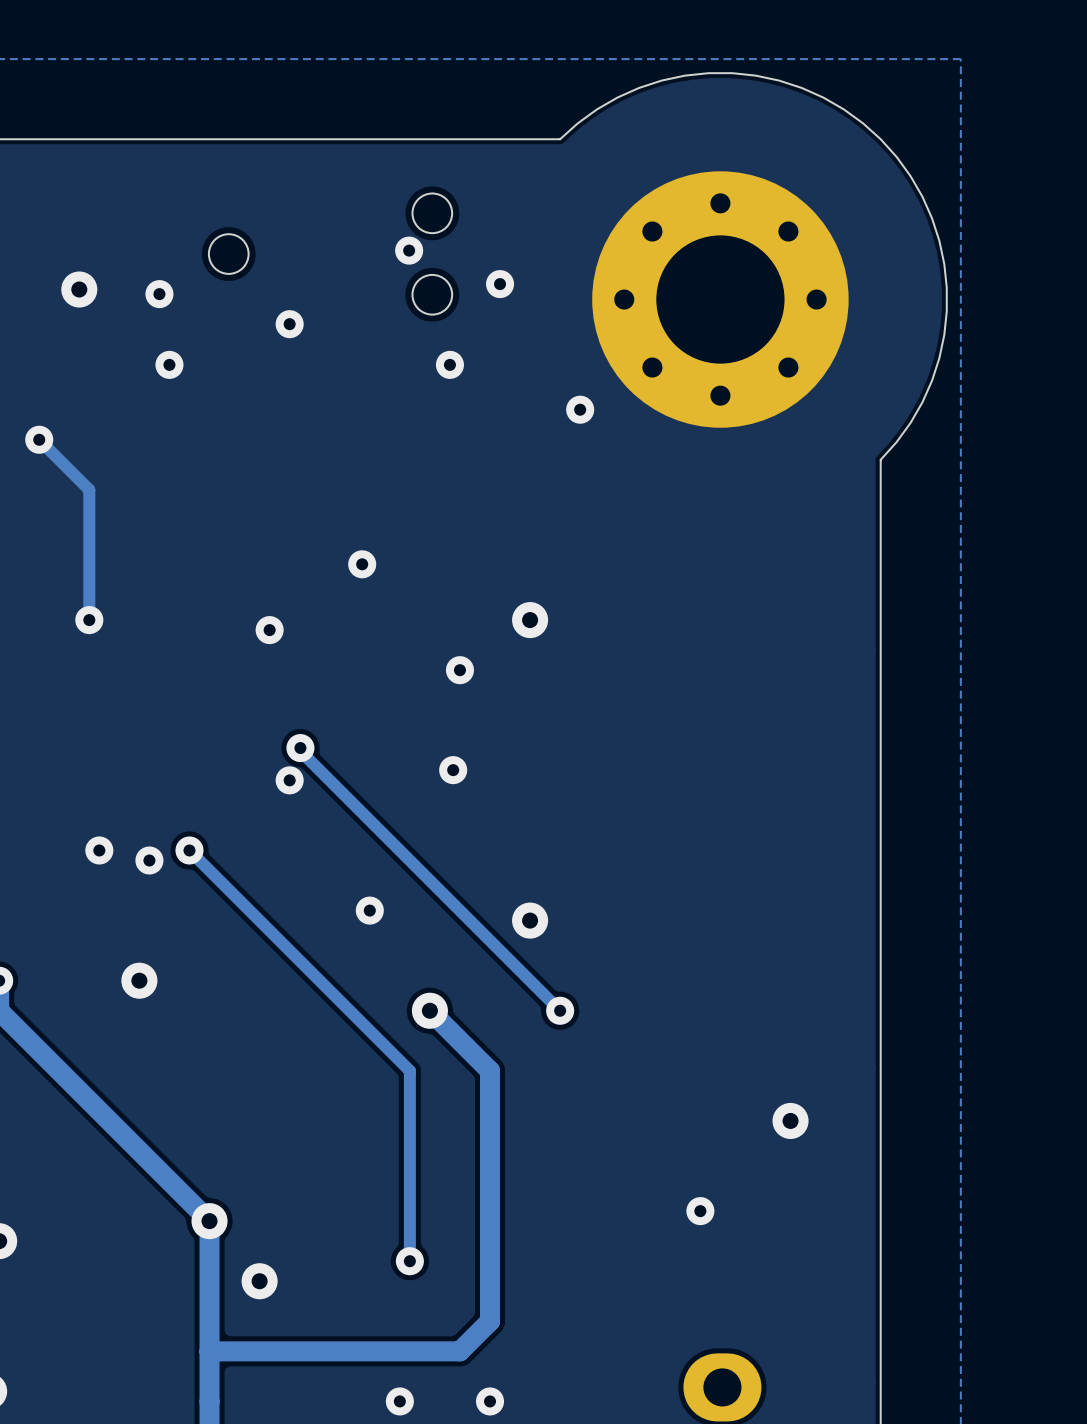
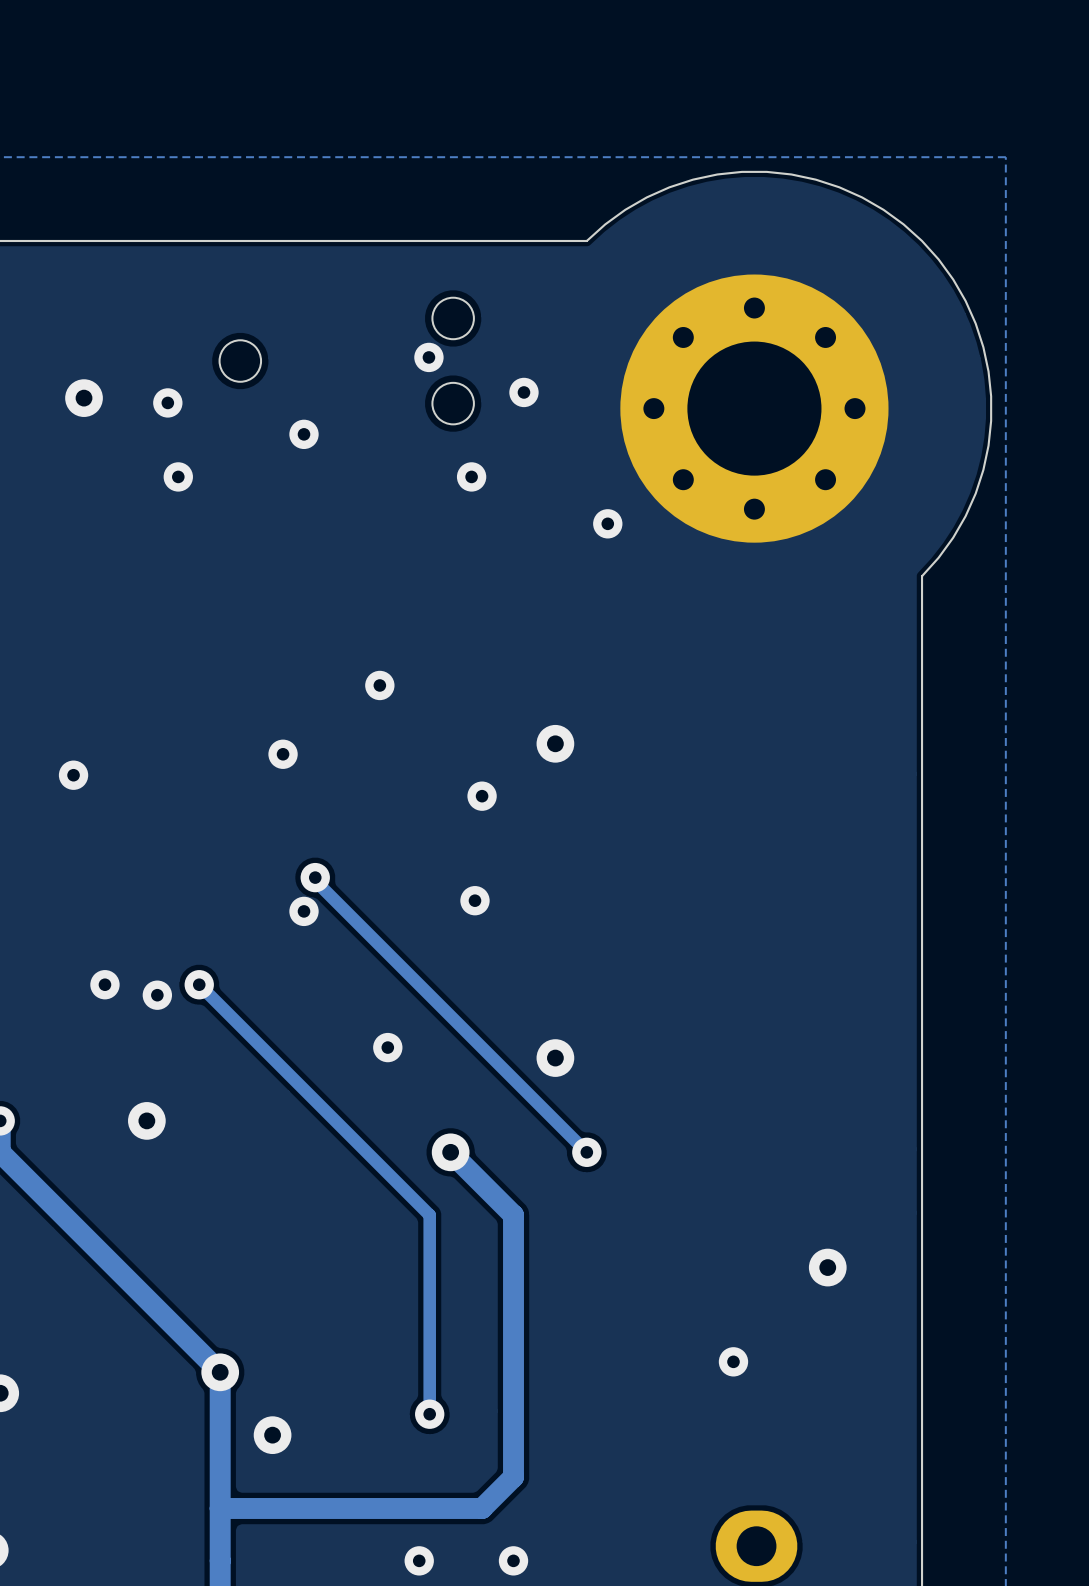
track: (39, 439) (89, 489) (89, 620) -> none
via: (39, 439) -> none
via position: (89, 620) -> (73, 775)

